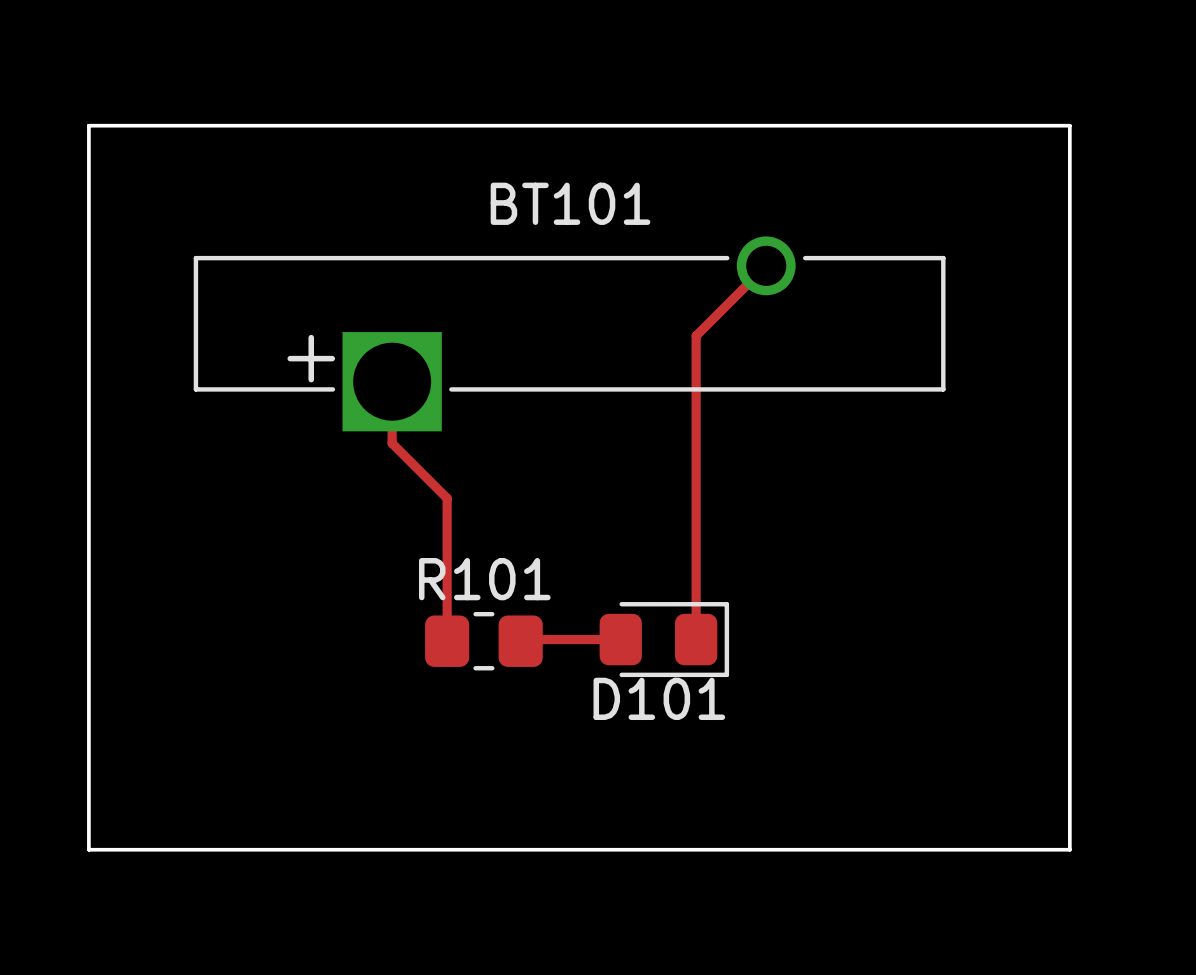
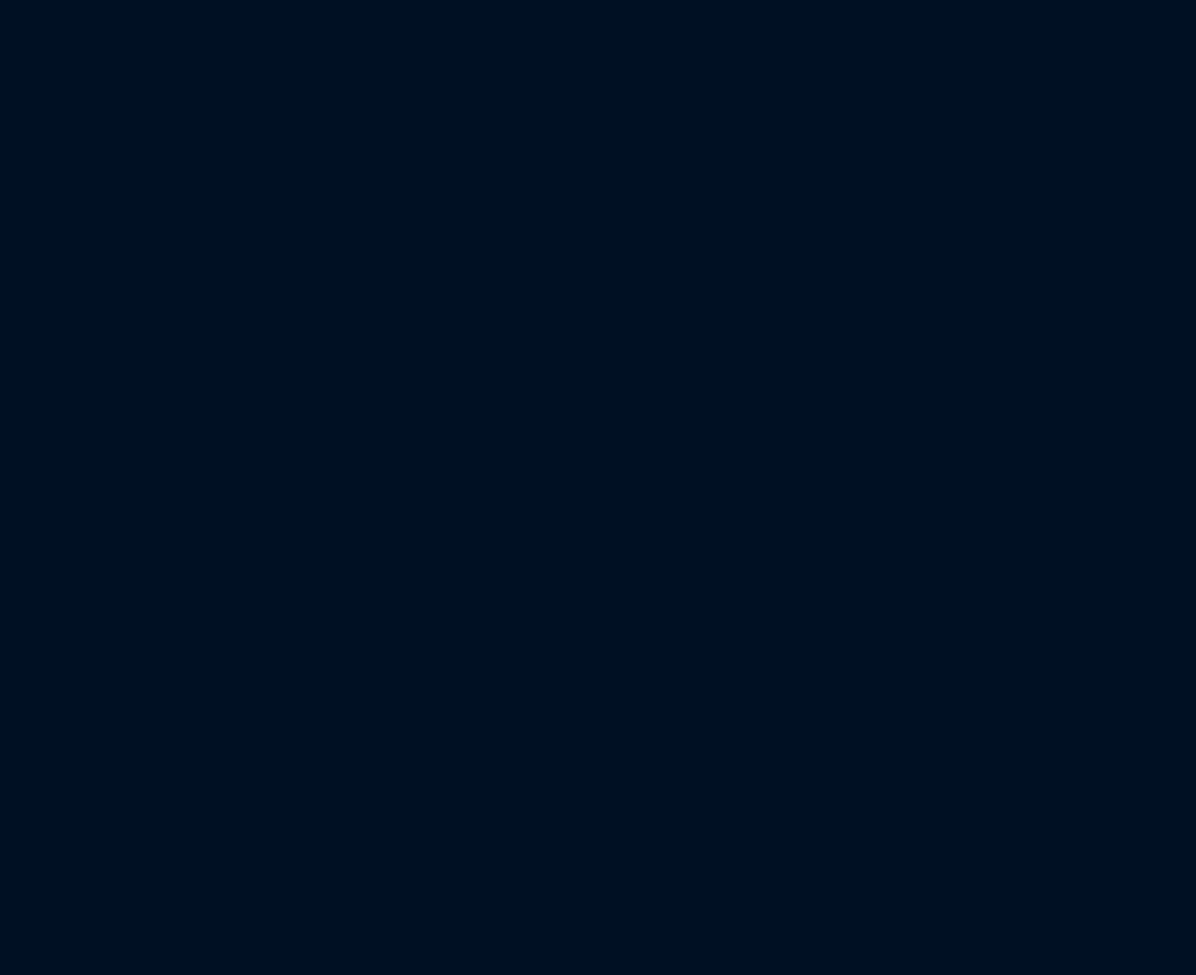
board edge: (88, 125) (1069, 125) (1069, 849) (88, 849) (88, 125) -> none
track: (766, 265) (696, 335) (696, 639) -> none
BT101: (569, 333) -> none
track: (392, 381) (392, 443) (447, 498) (447, 641) -> none
track: (620, 639) (522, 639) (520, 641) -> none
D101: (664, 639) -> none
R101: (483, 641) -> none

